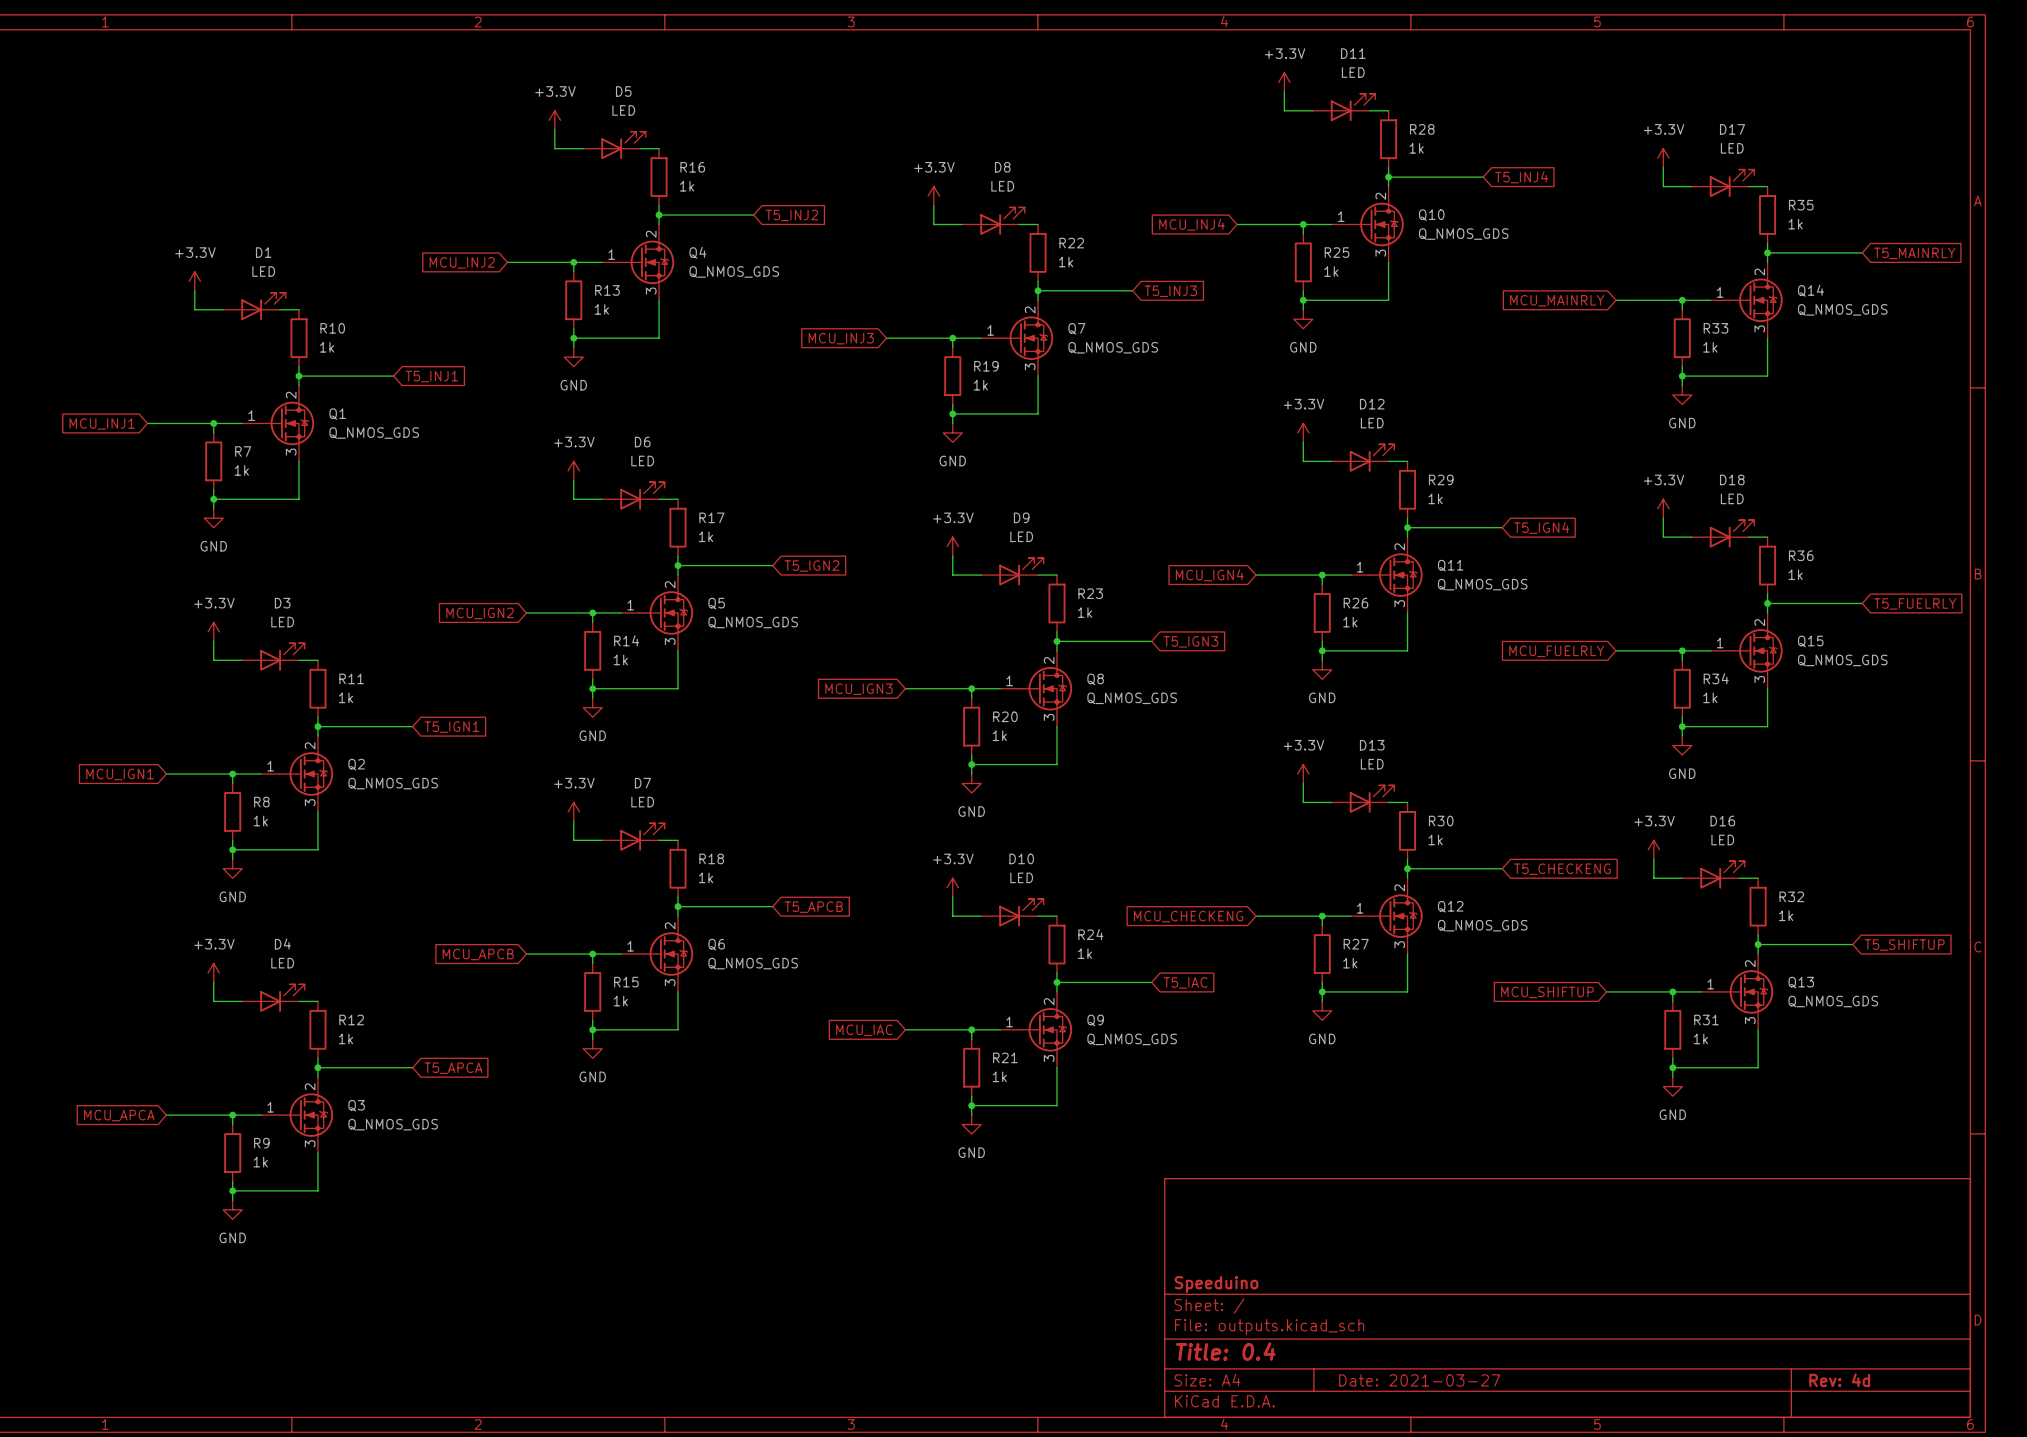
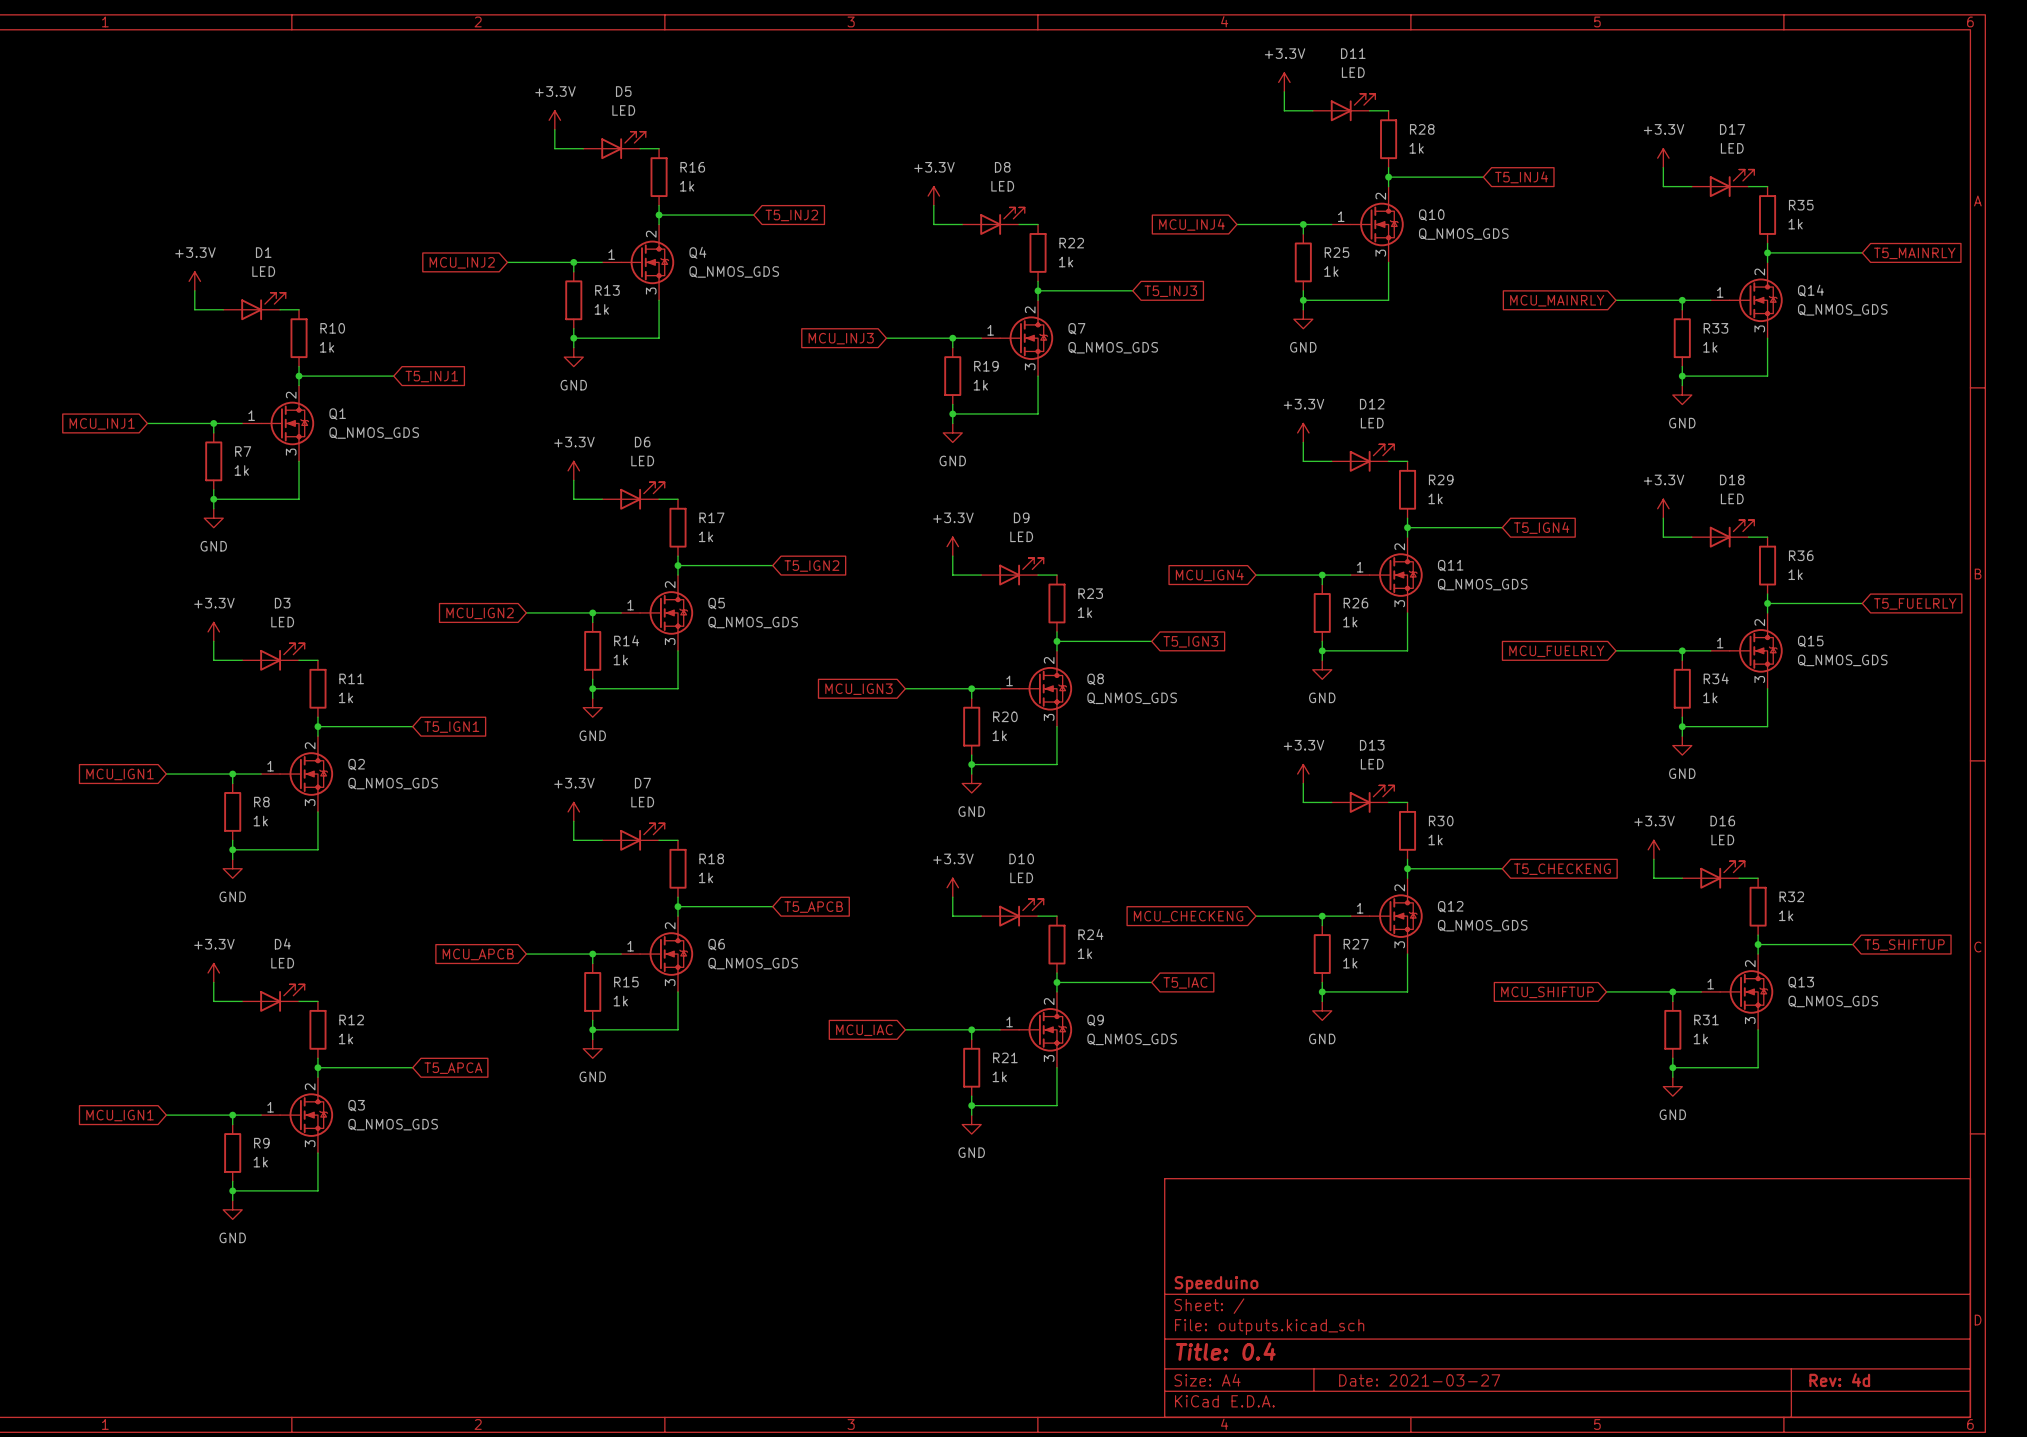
global label: MCU_APCA (119, 1115) -> MCU_IGN1 (120, 1115)

